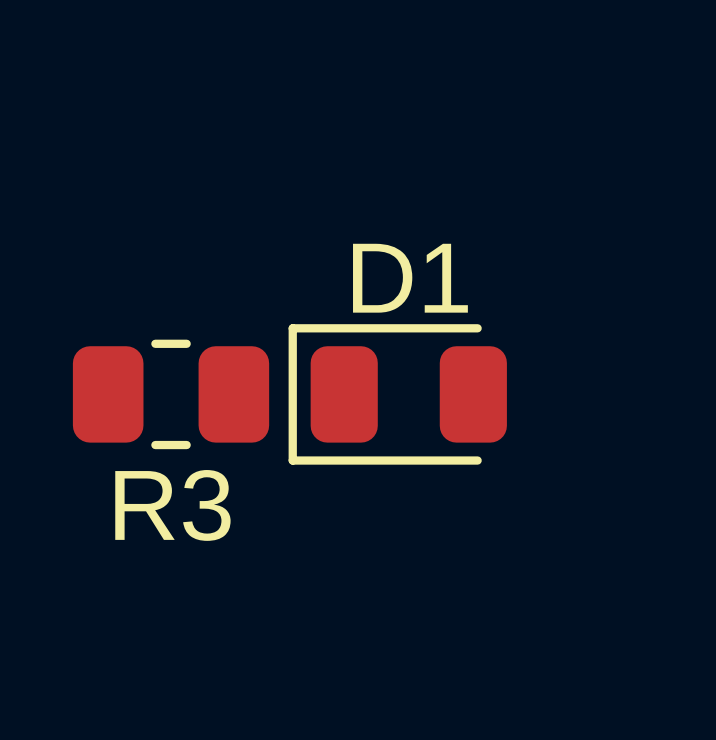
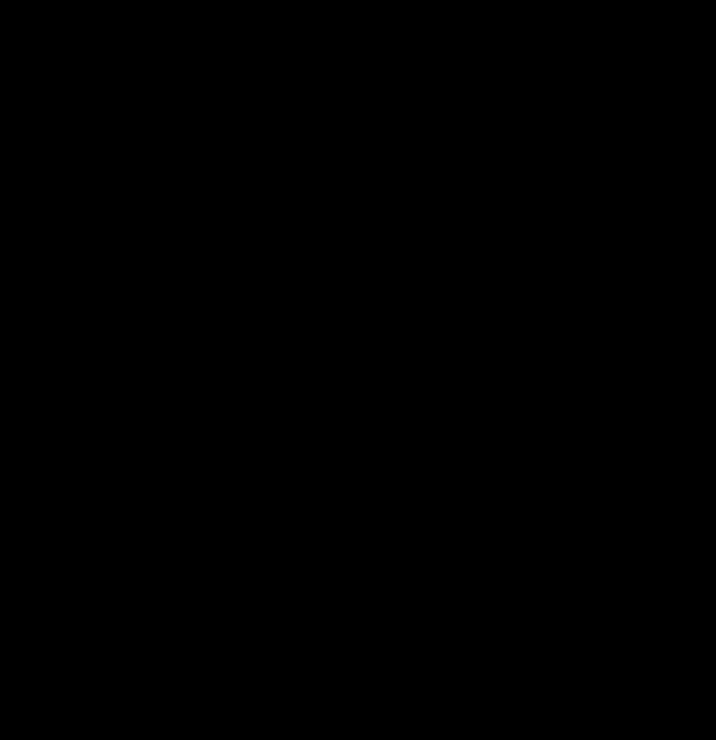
R3: (171, 394) -> none
D1: (397, 394) -> none

